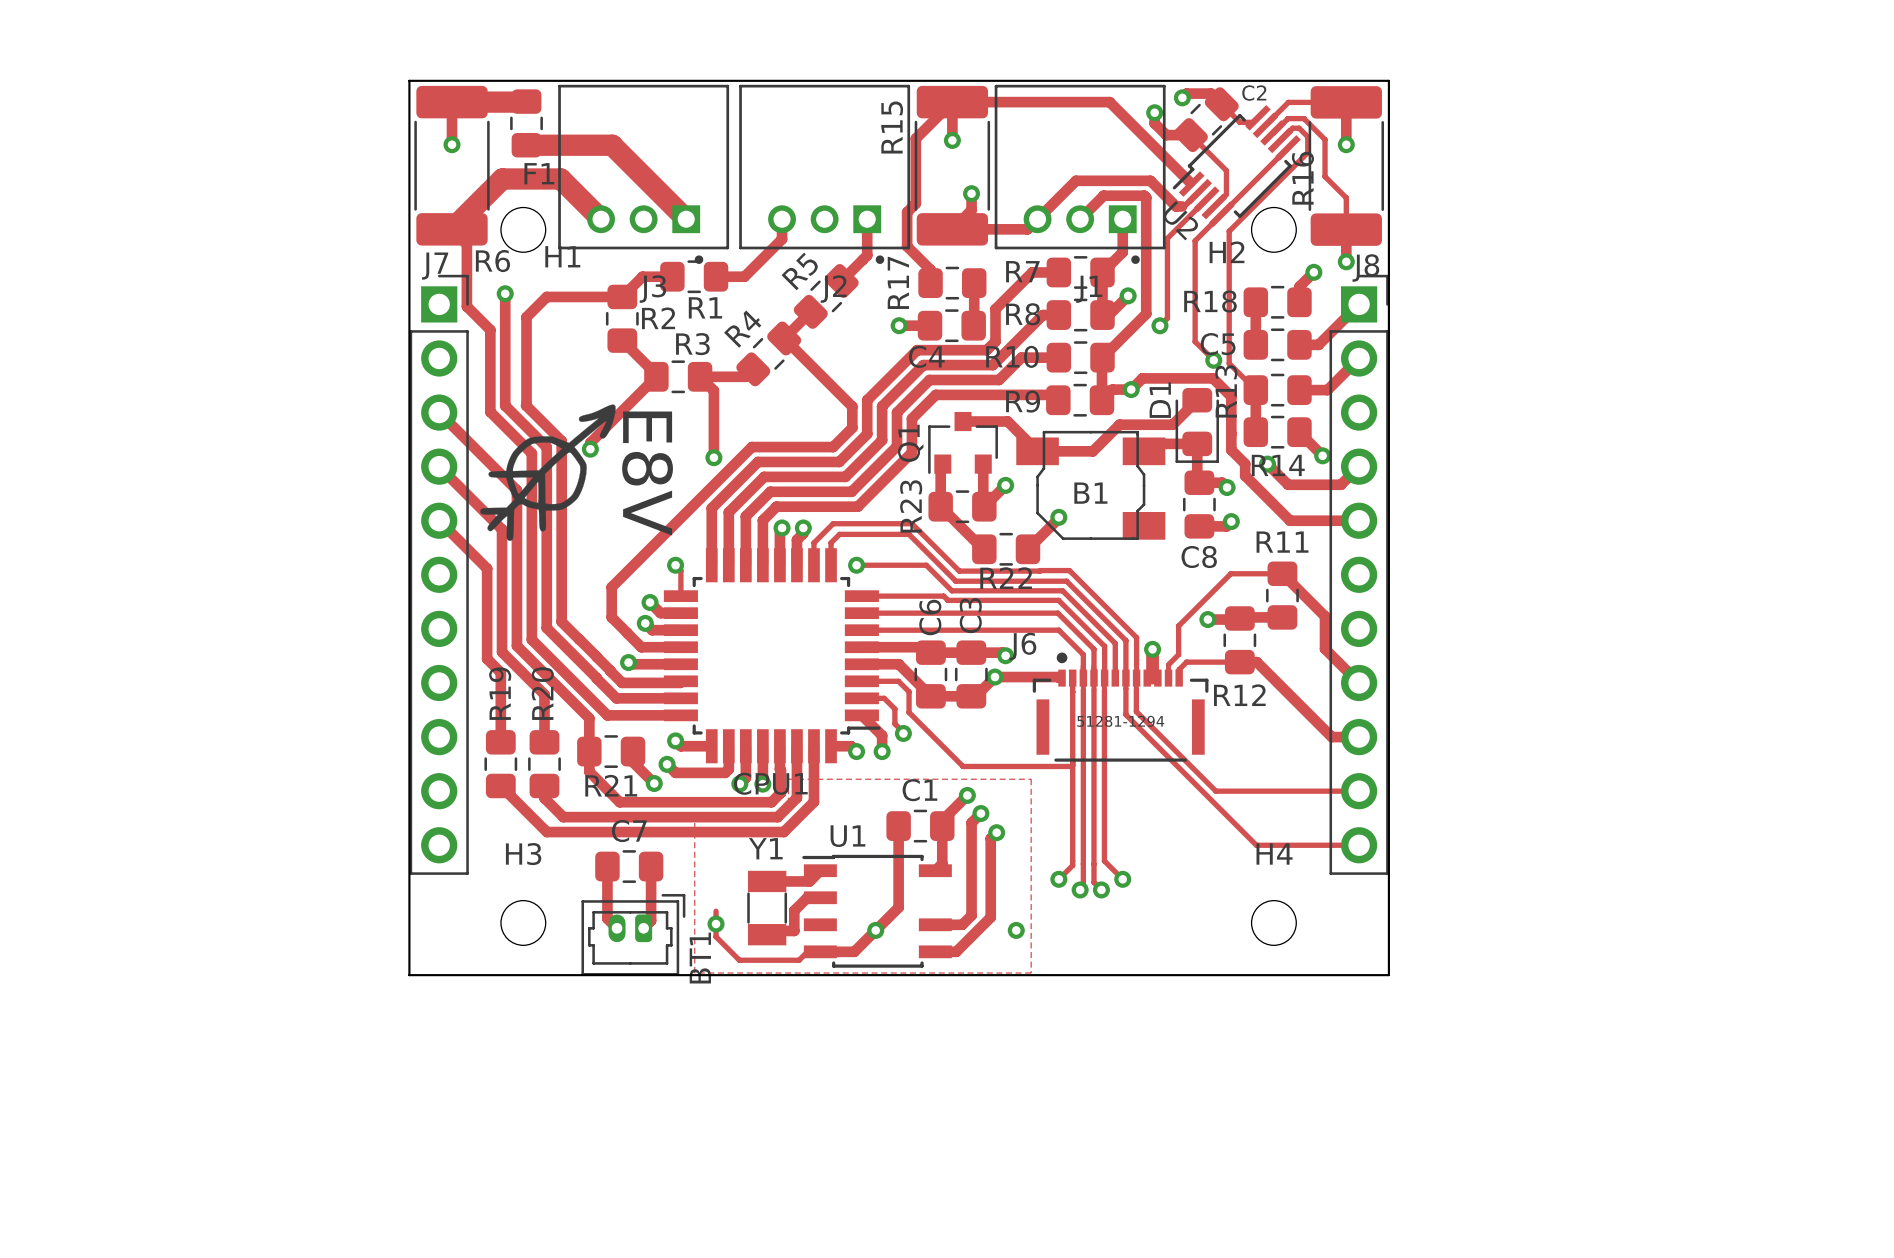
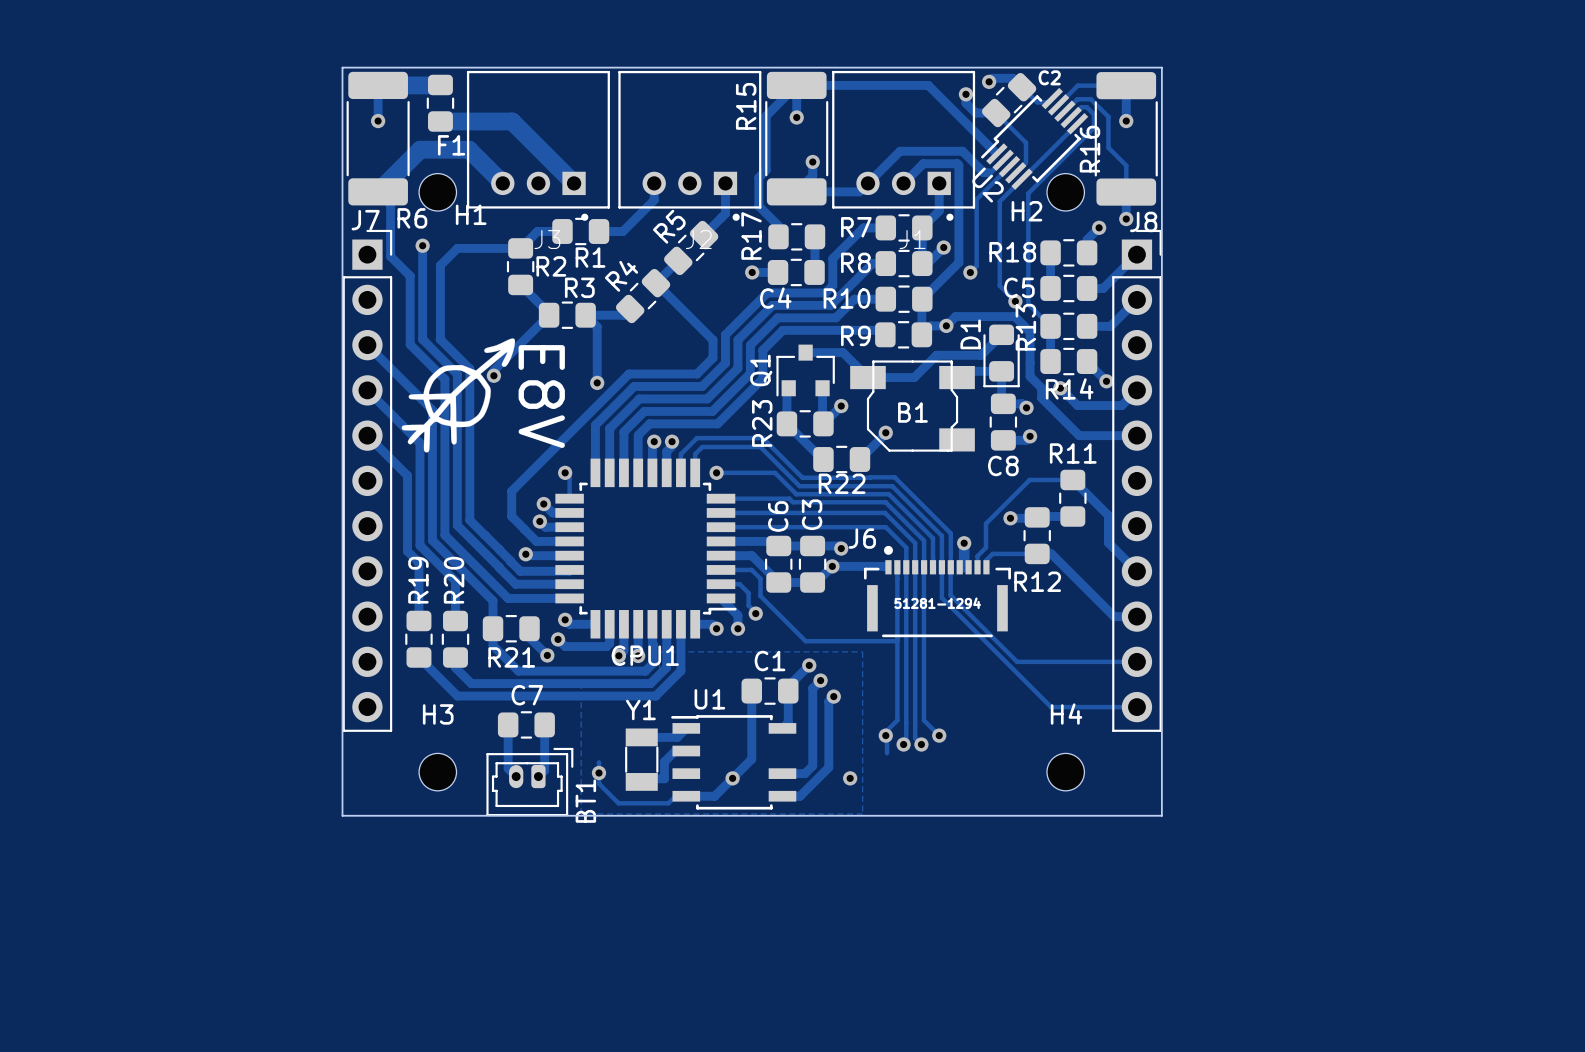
track: (1072, 861) (1072, 865) (1058, 879) -> (897, 720) (887, 730) (887, 753)

